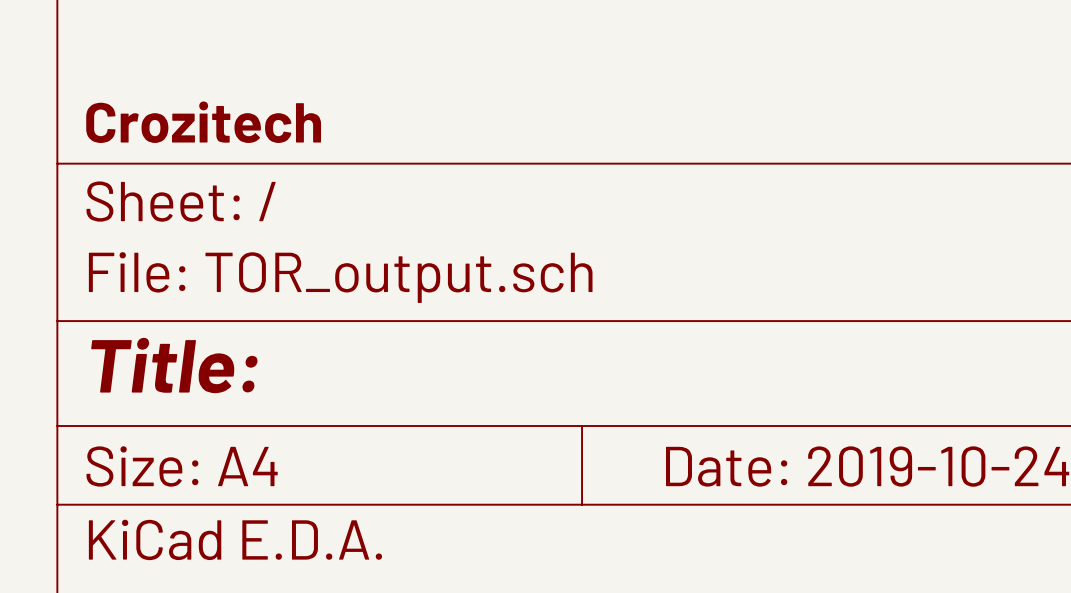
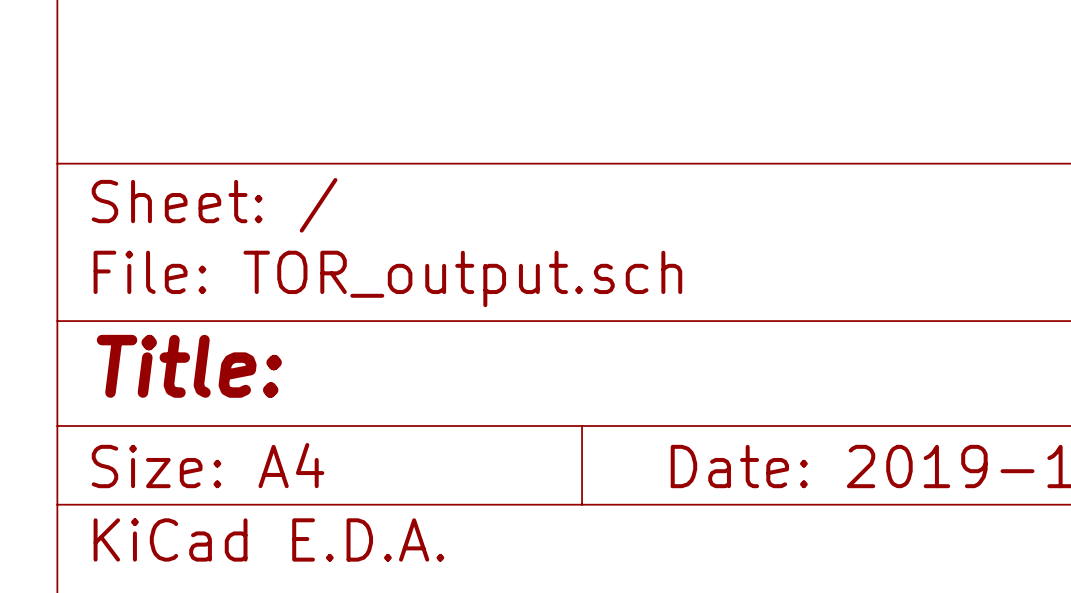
title block: Crozitech (203, 122) -> none

